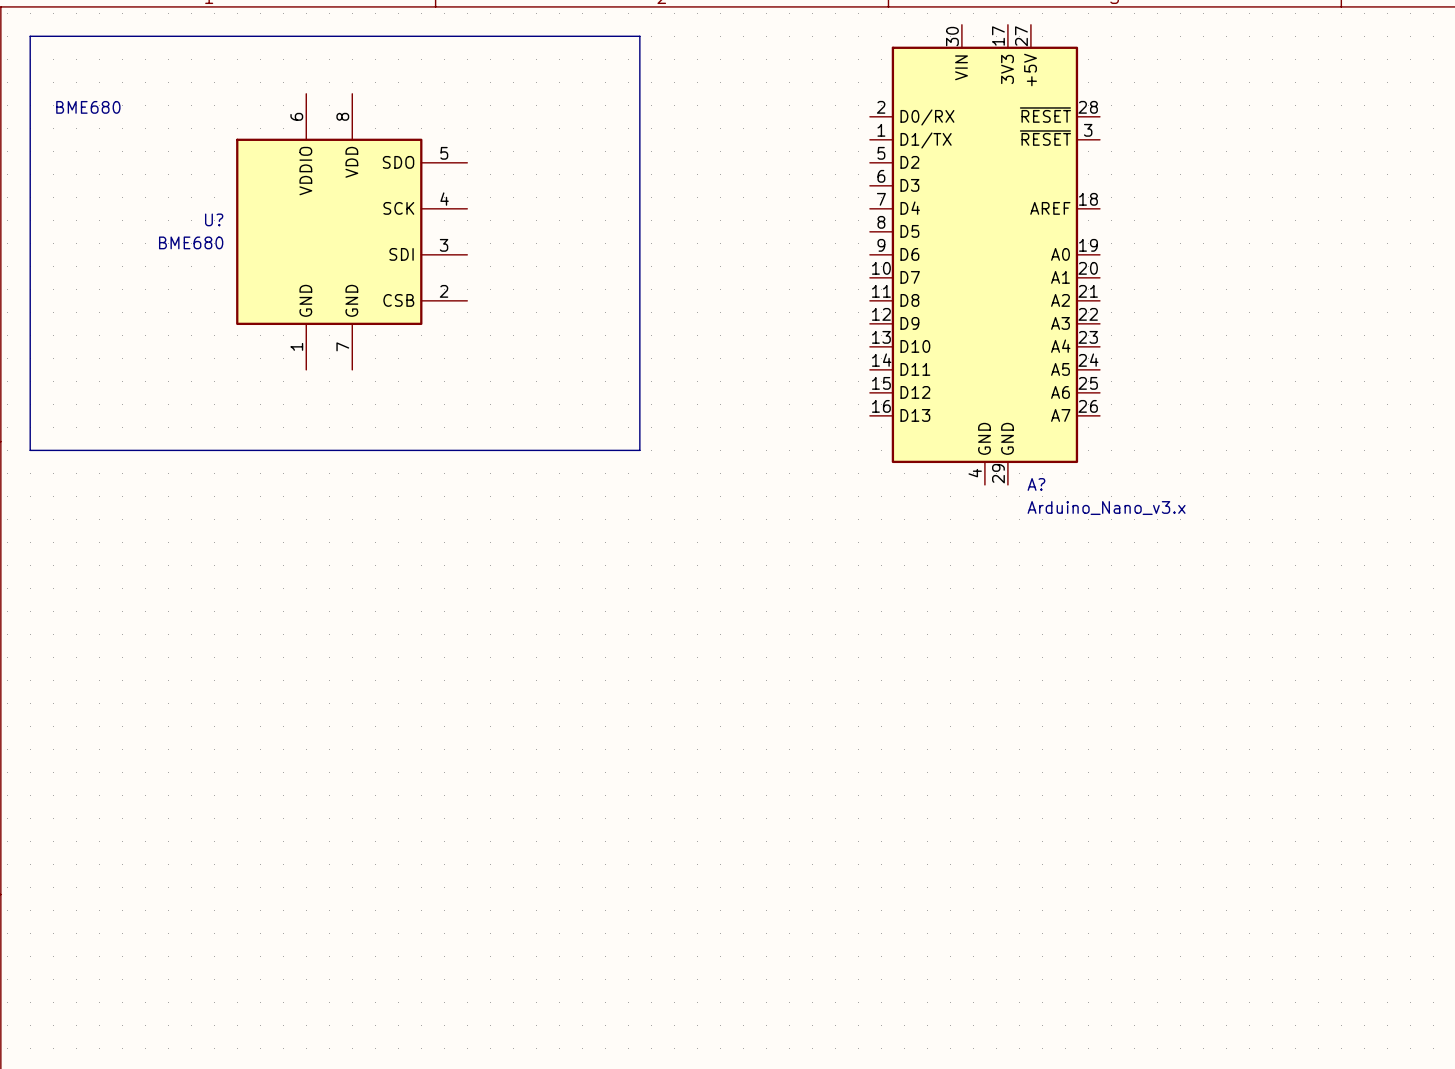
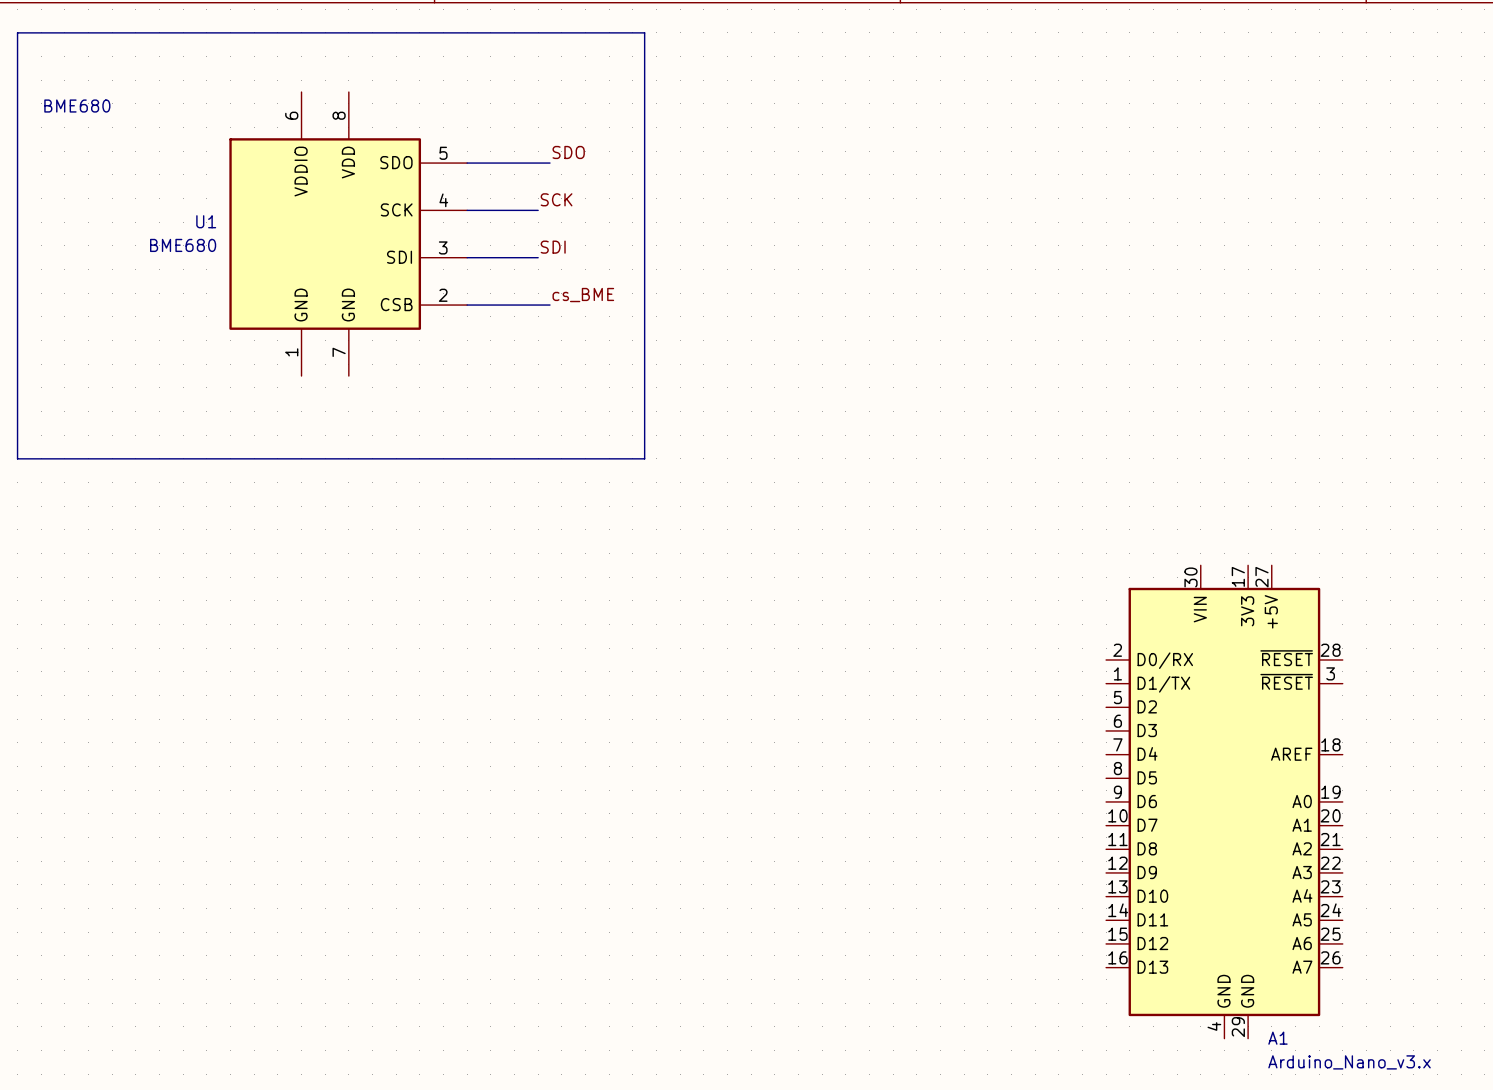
label: none -> SDO (568, 152)
wire: none -> (467, 163) (549, 163)
label: none -> SCK (556, 199)
wire: none -> (467, 210) (538, 210)
U? name: U? (214, 219) -> U1 (206, 221)
label: none -> SDI (553, 247)
wire: none -> (467, 257) (538, 257)
A?: Arduino_Nano_v3.x (984, 254) -> none
label: none -> cs_BME (583, 295)
wire: none -> (467, 305) (549, 305)
A1: none -> Arduino_Nano_v3.x (1224, 801)

